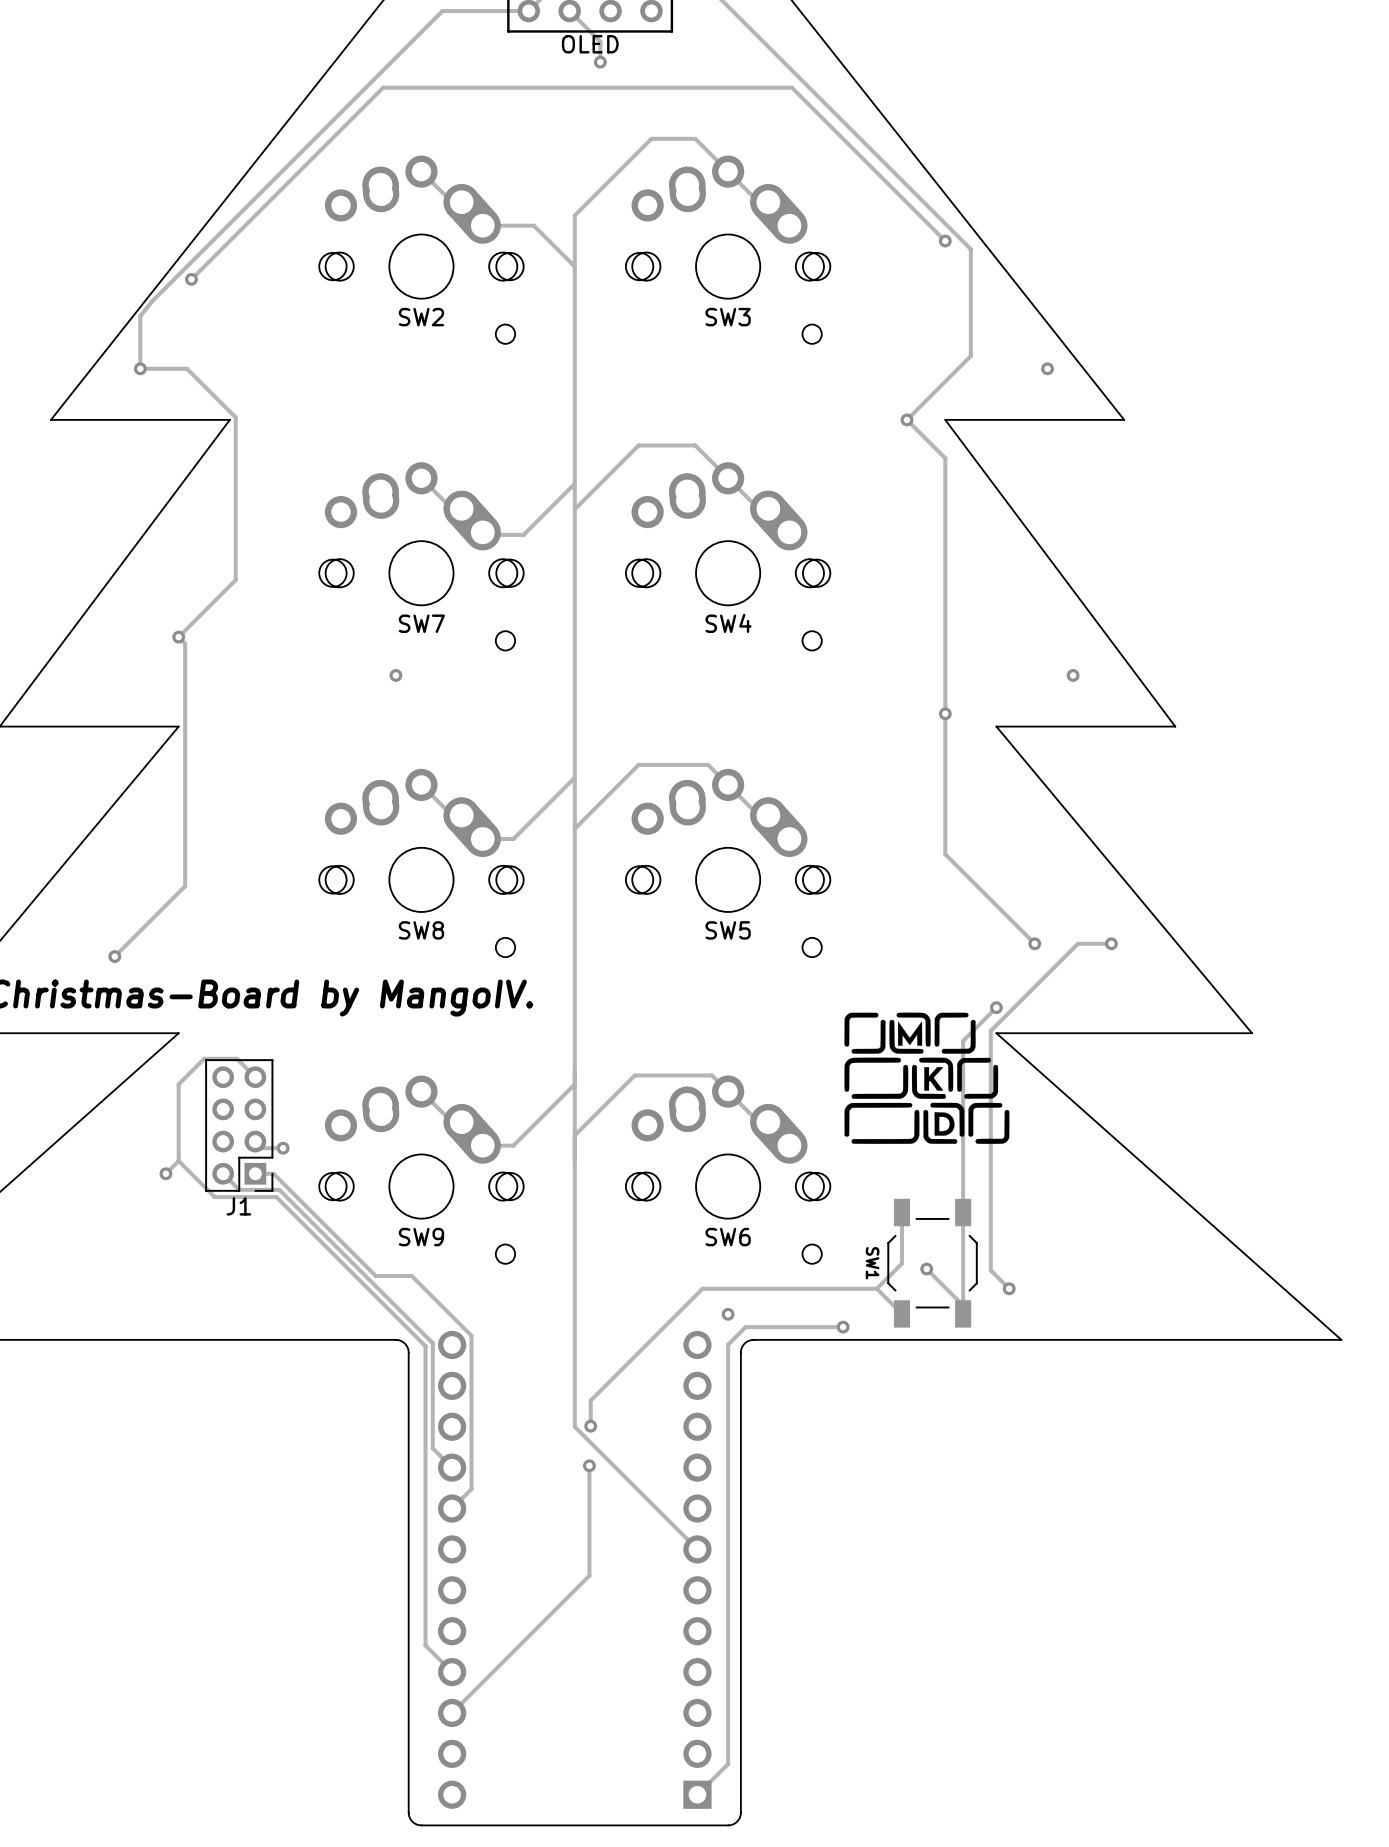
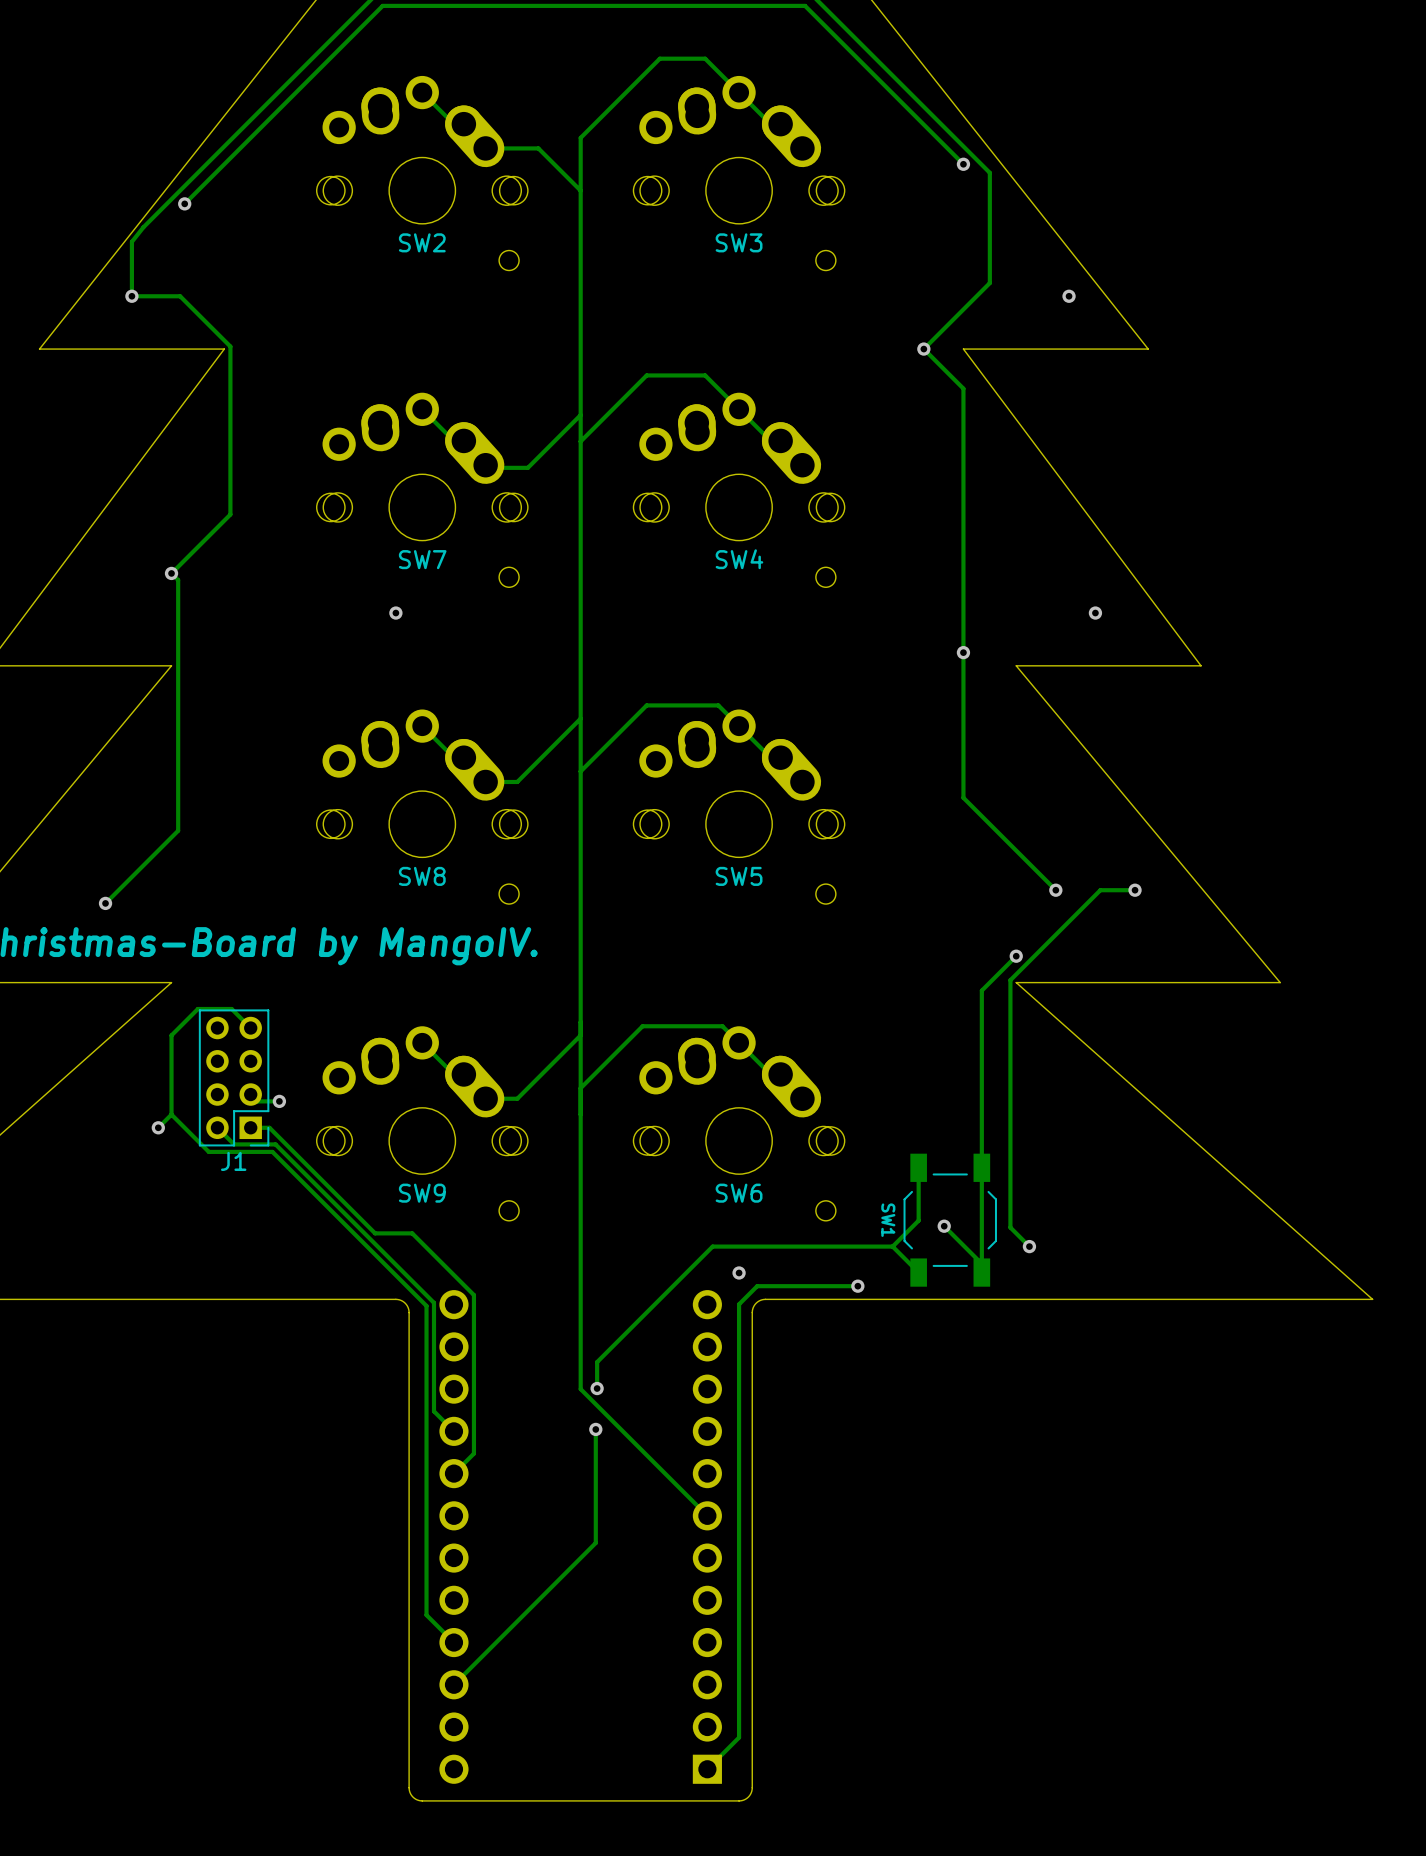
drawing: [844, 1012, 1010, 1144] -> none

